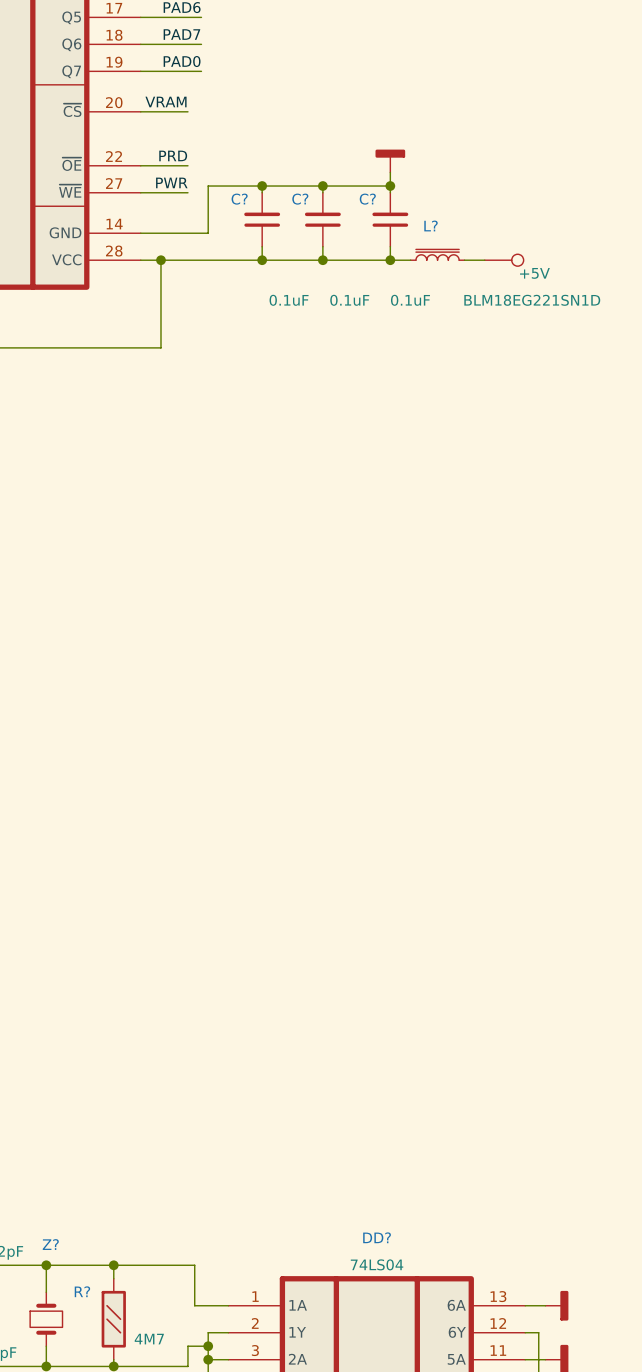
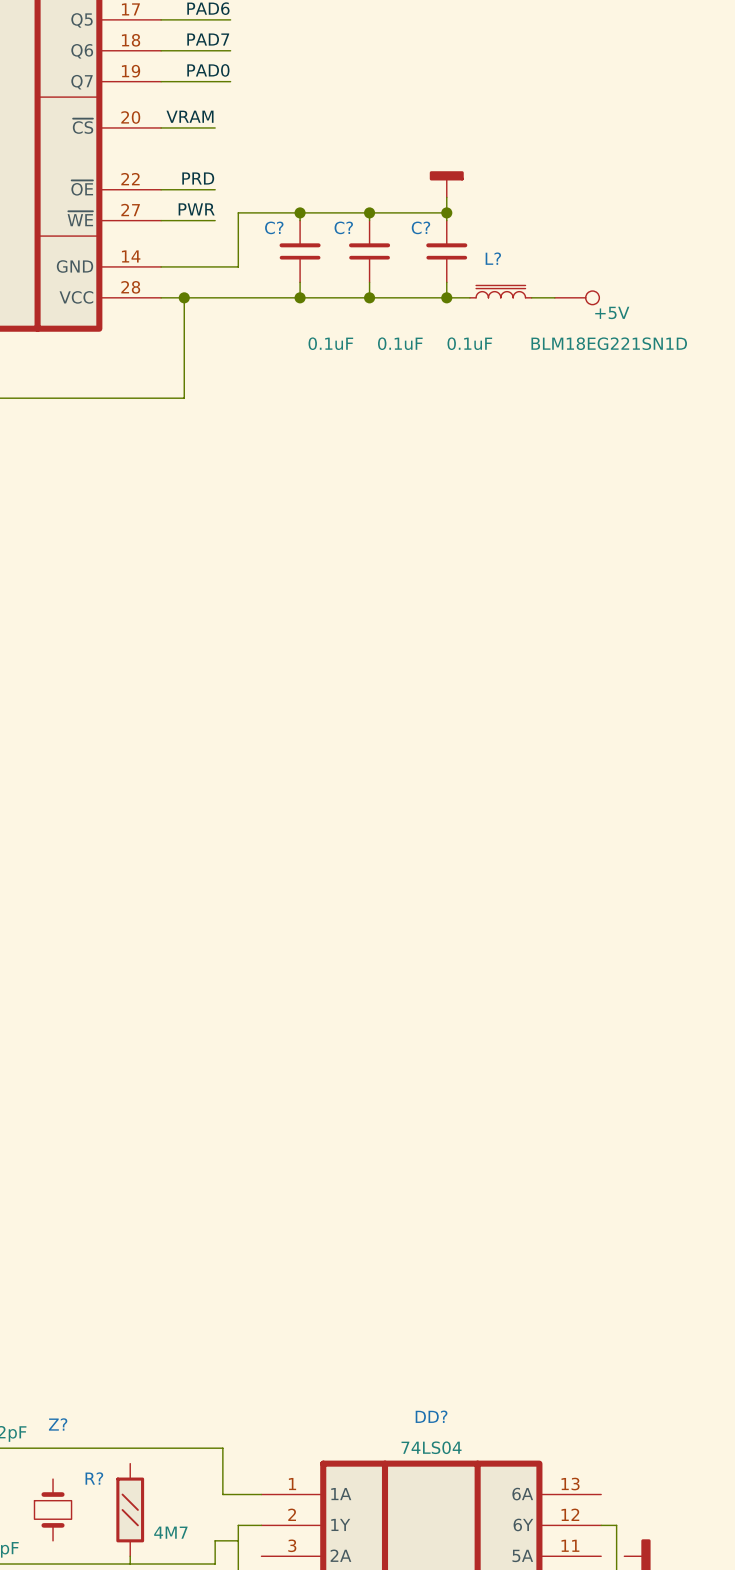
wire: (46, 1265) (46, 1292) -> none
junction: (46, 1265) -> none
wire: (113, 1265) (113, 1278) -> none
junction: (113, 1265) -> none
wire: (525, 1305) (545, 1305) -> none
power symbol: (556, 1305) -> none
wire: (46, 1346) (46, 1366) -> none
junction: (208, 1346) -> none
wire: (208, 1359) (228, 1359) -> none
junction: (208, 1359) -> none
wire: (525, 1359) (545, 1359) -> none
junction: (46, 1366) -> none
junction: (113, 1366) -> none

